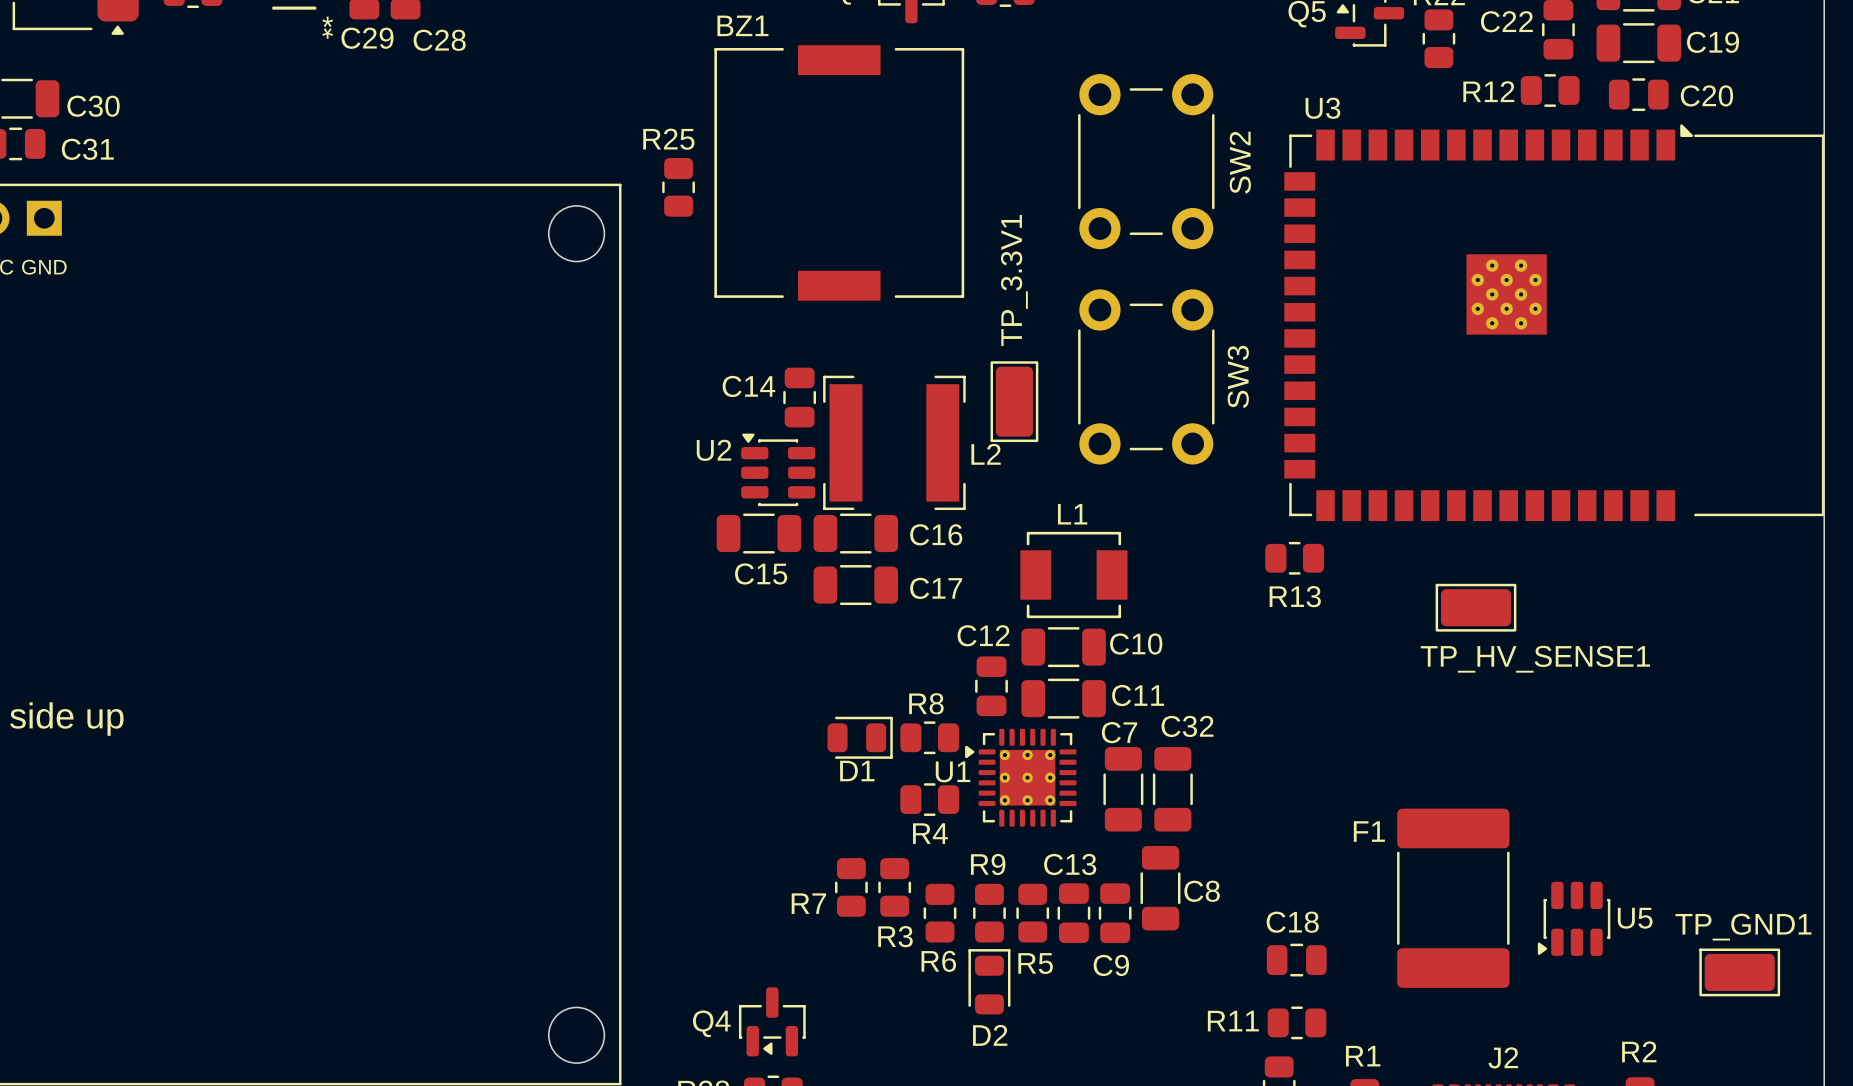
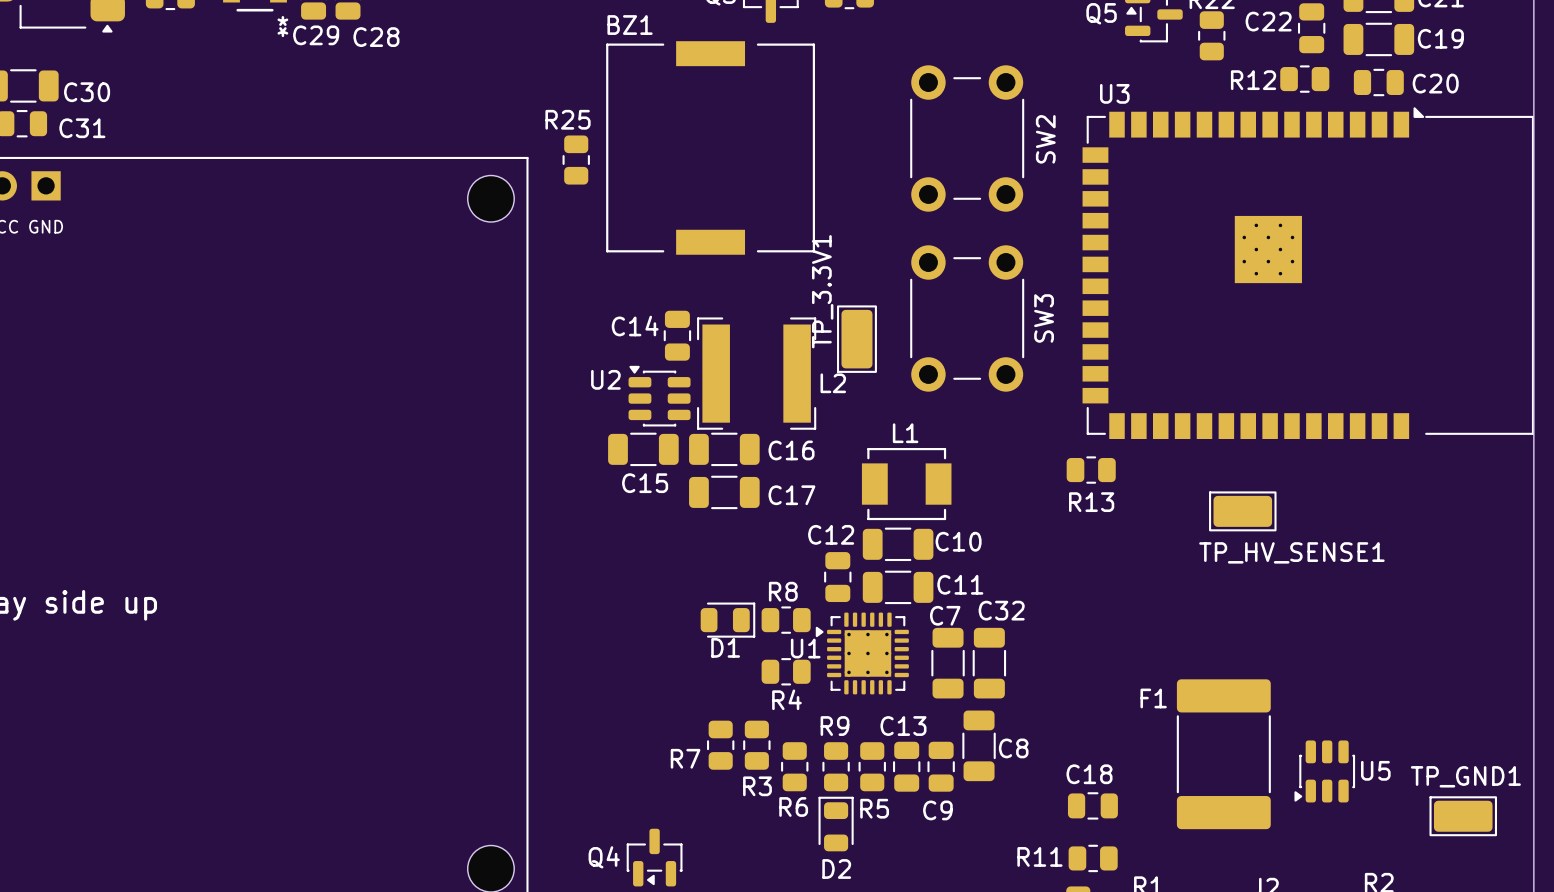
TP_3.3V1 name position: TP_3.3V1 (1014, 280) -> TP_3.3V1 (822, 291)

